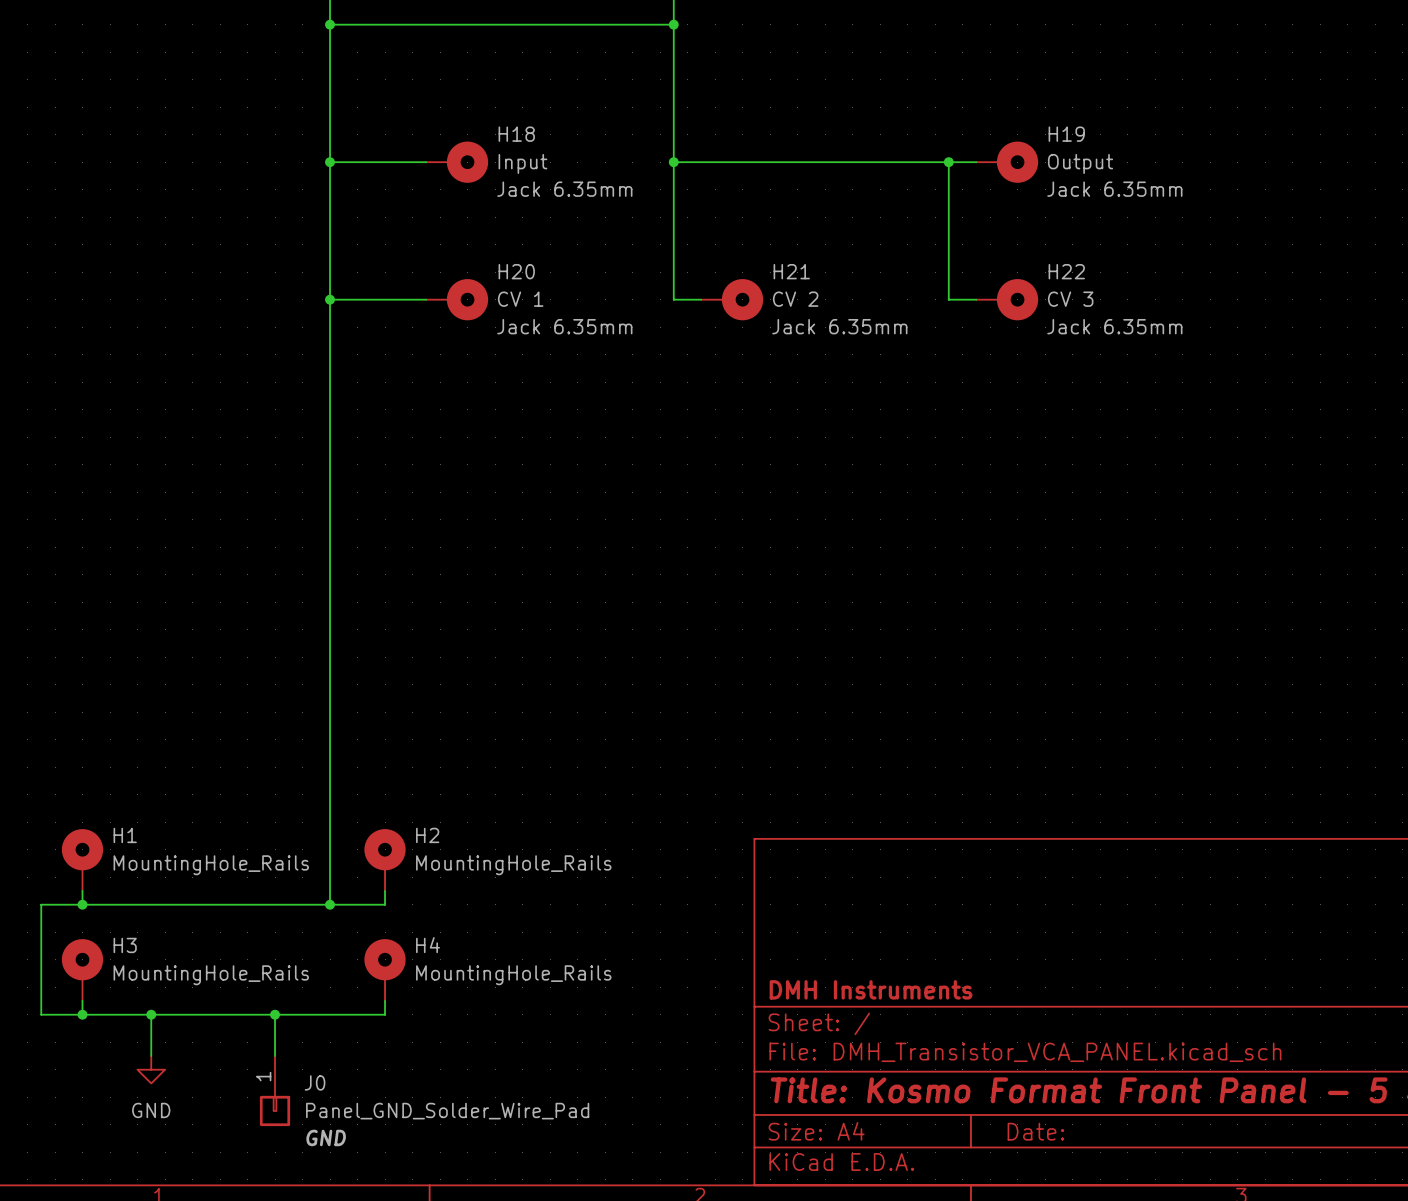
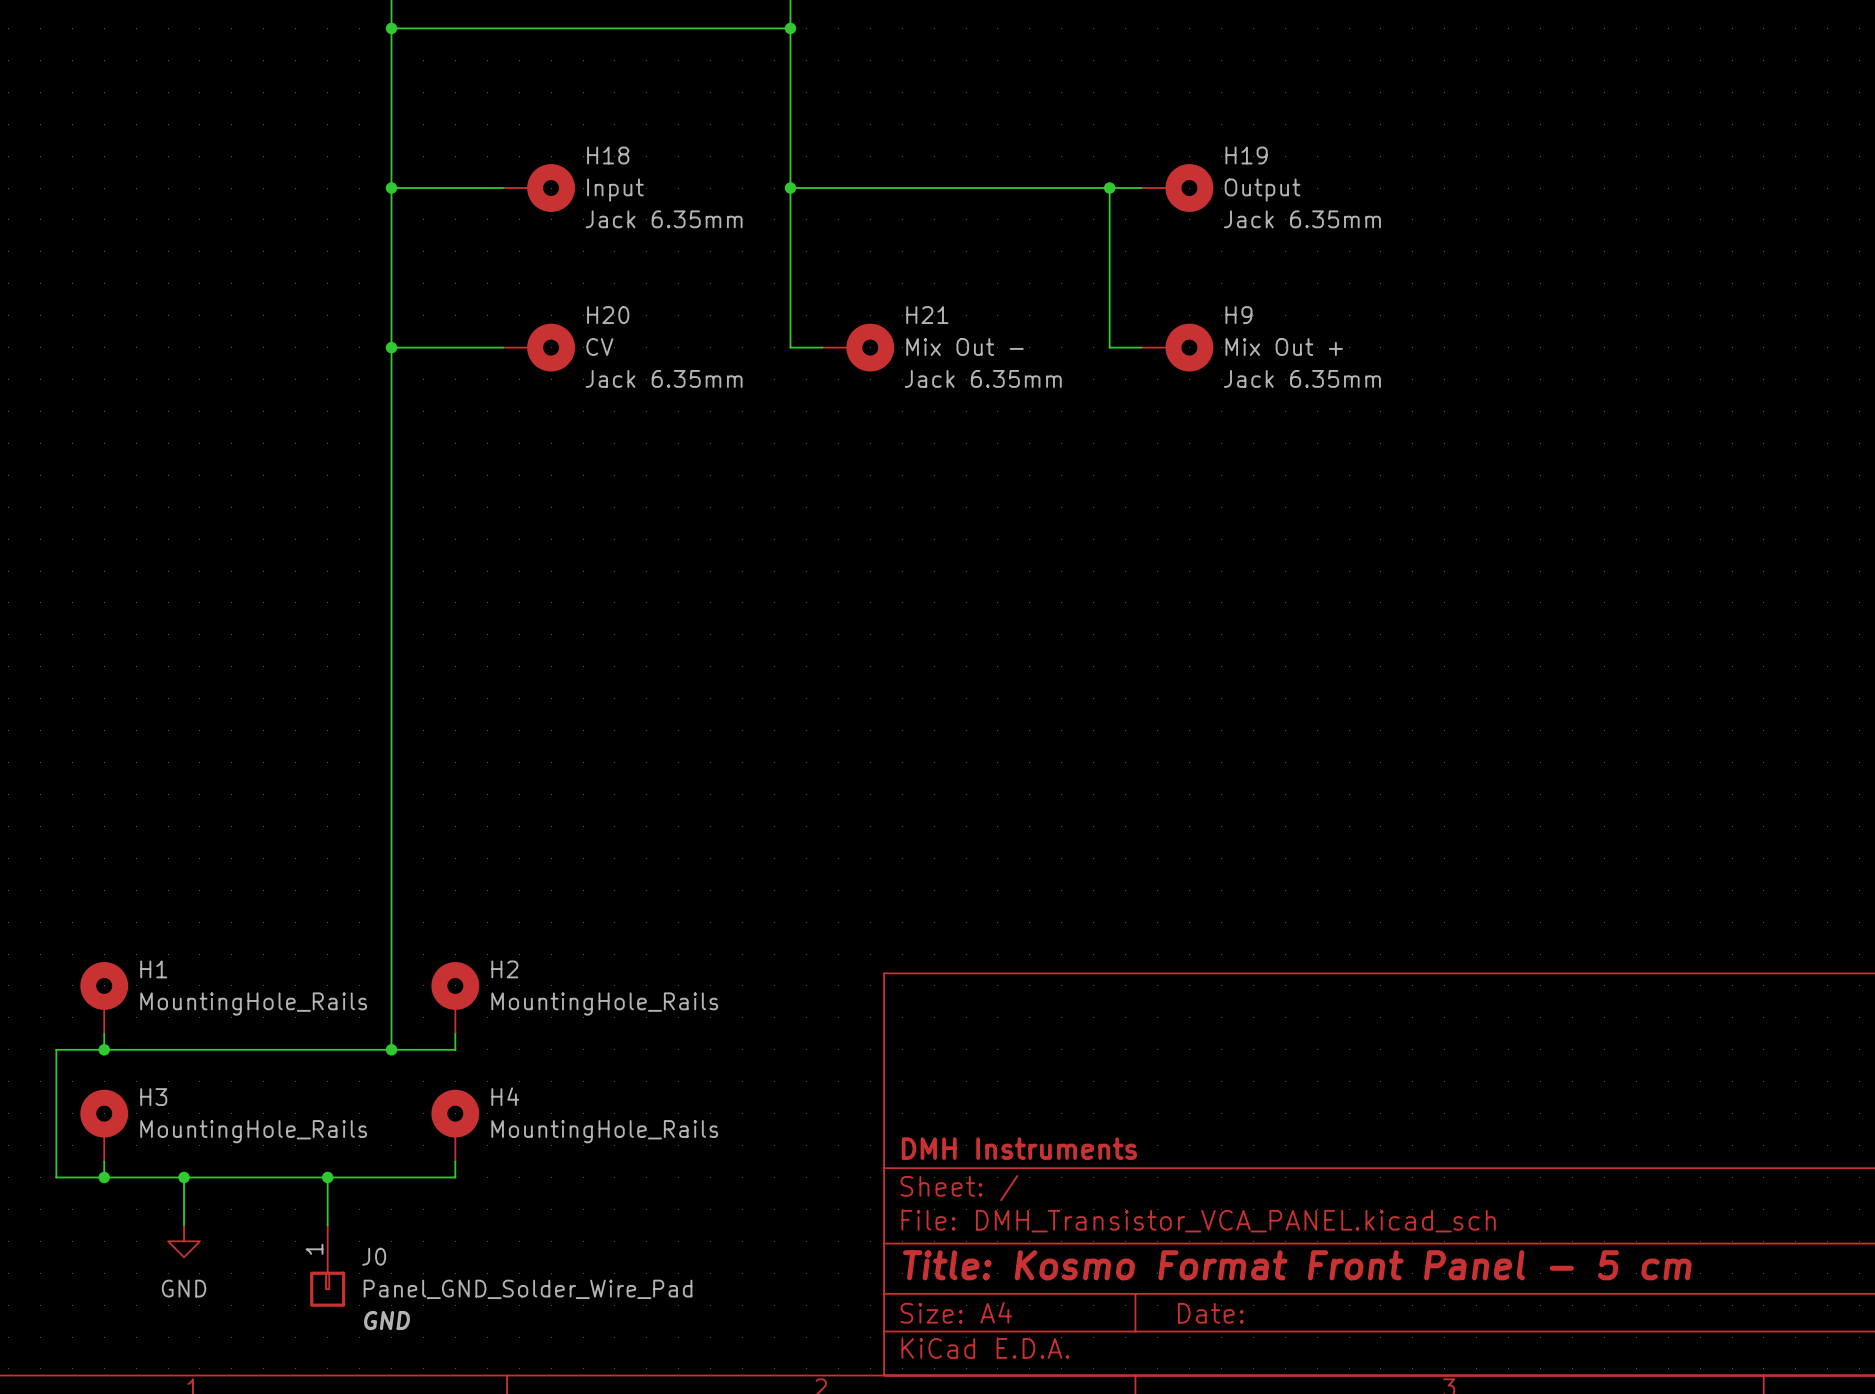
H22 name: H22 (1066, 271) -> H9 (1238, 315)
H20 value: CV 1 (520, 299) -> CV (599, 347)
H21 value: CV 2 (795, 299) -> Mix Out - (965, 347)
H22 value: CV 3 (1070, 299) -> Mix Out + (1284, 347)

